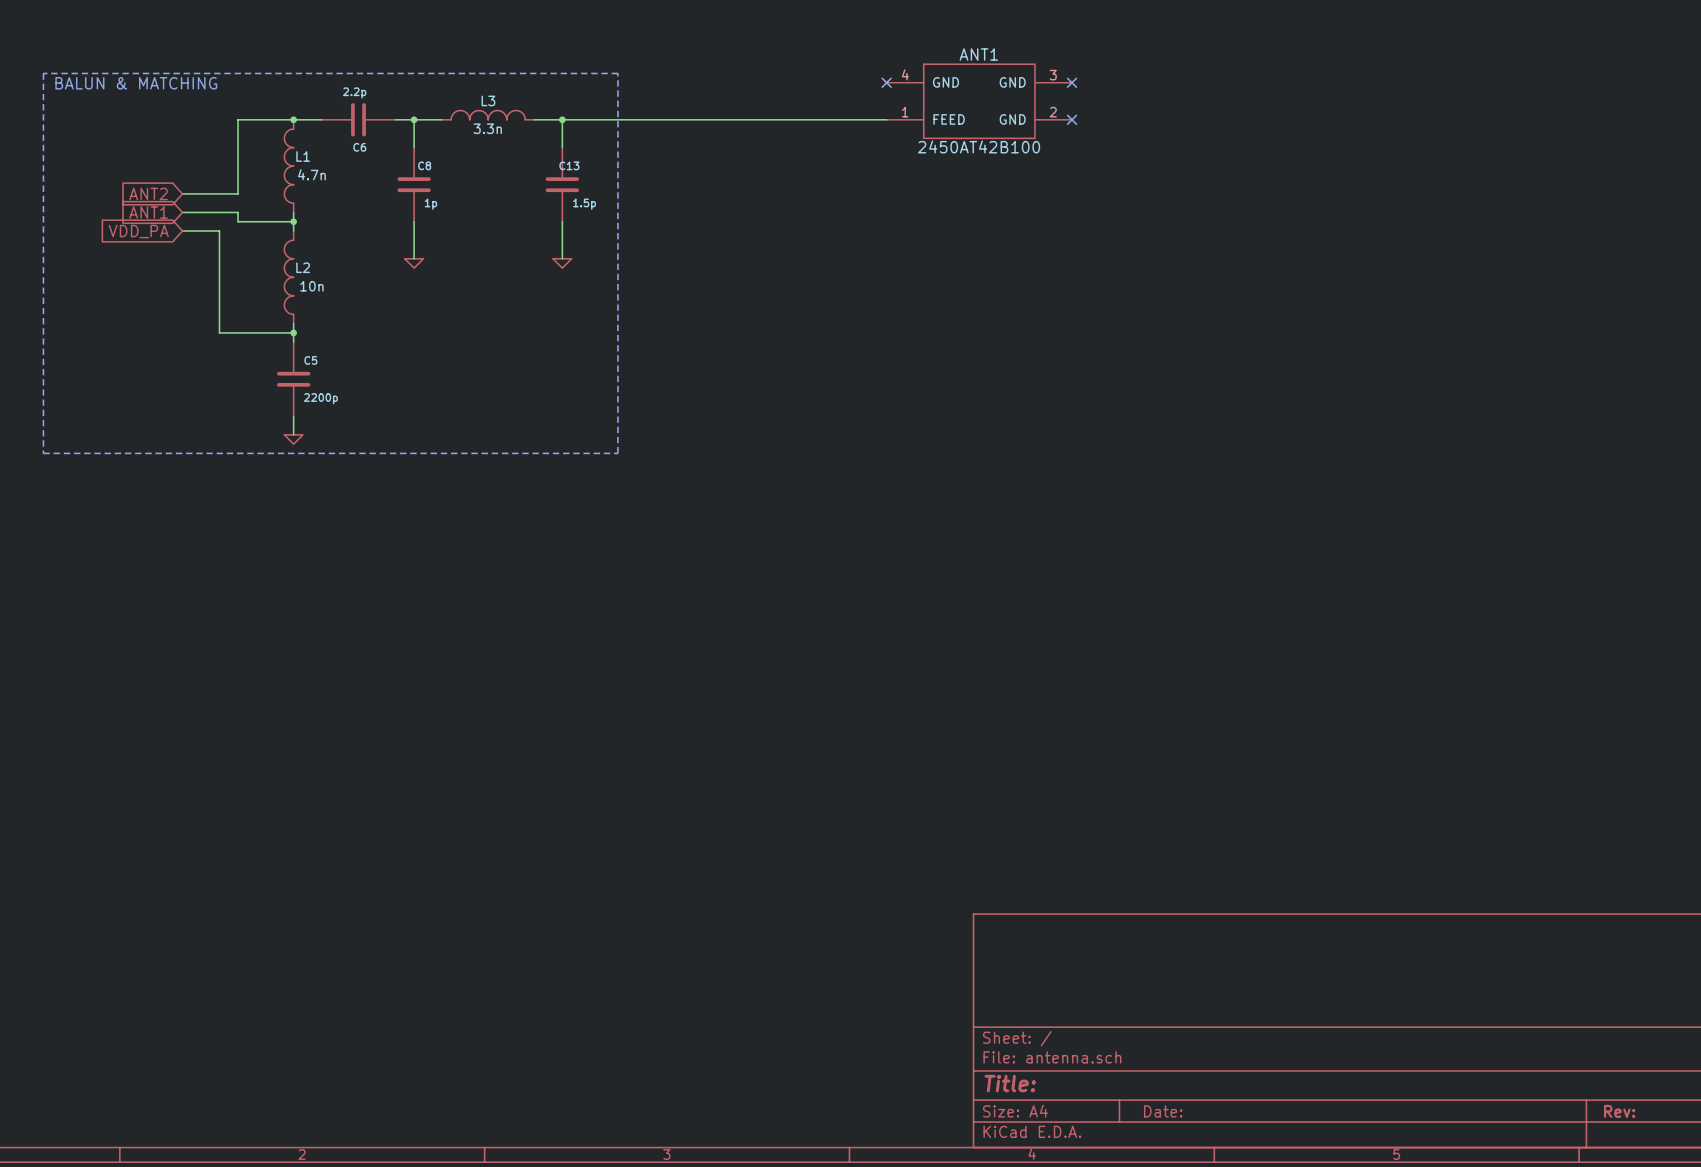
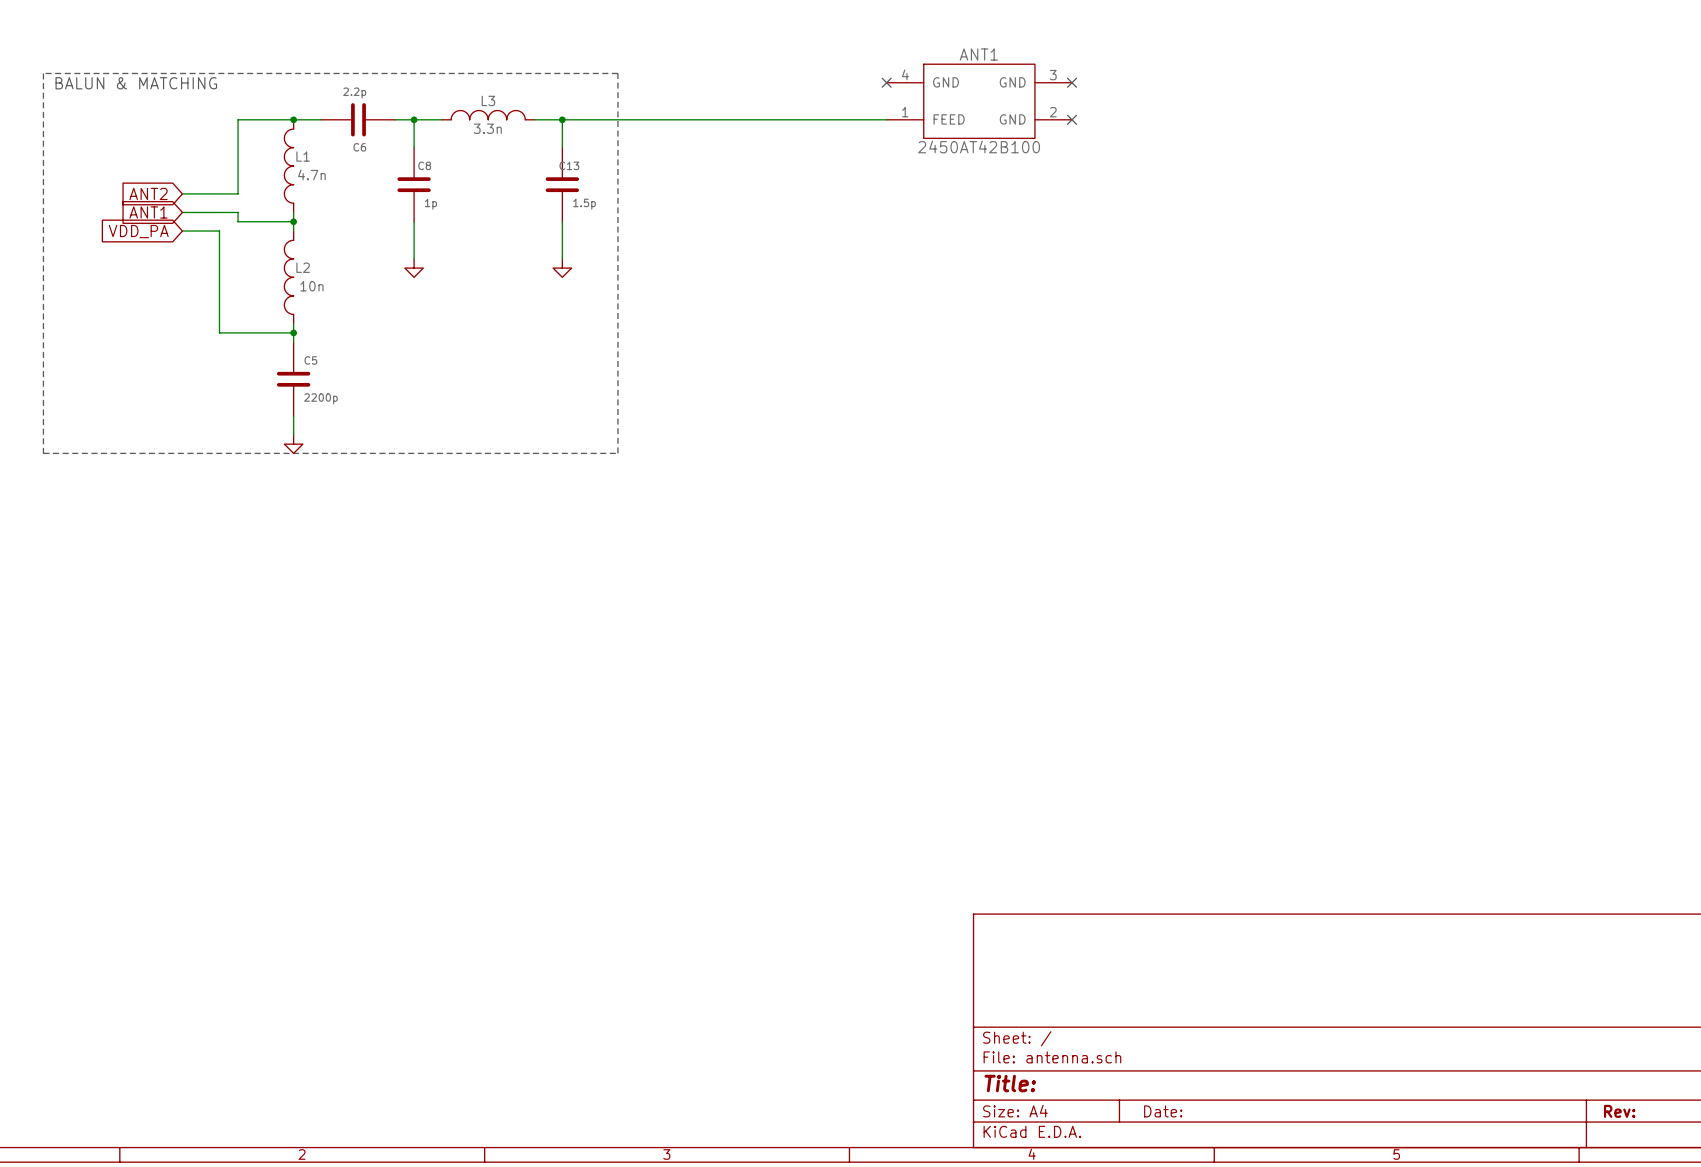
power symbol shape: [404, 258, 424, 269] -> [404, 258, 424, 278]
power symbol shape: [553, 258, 572, 269] -> [553, 258, 572, 278]
power symbol shape: [284, 434, 303, 445] -> [284, 434, 303, 454]

